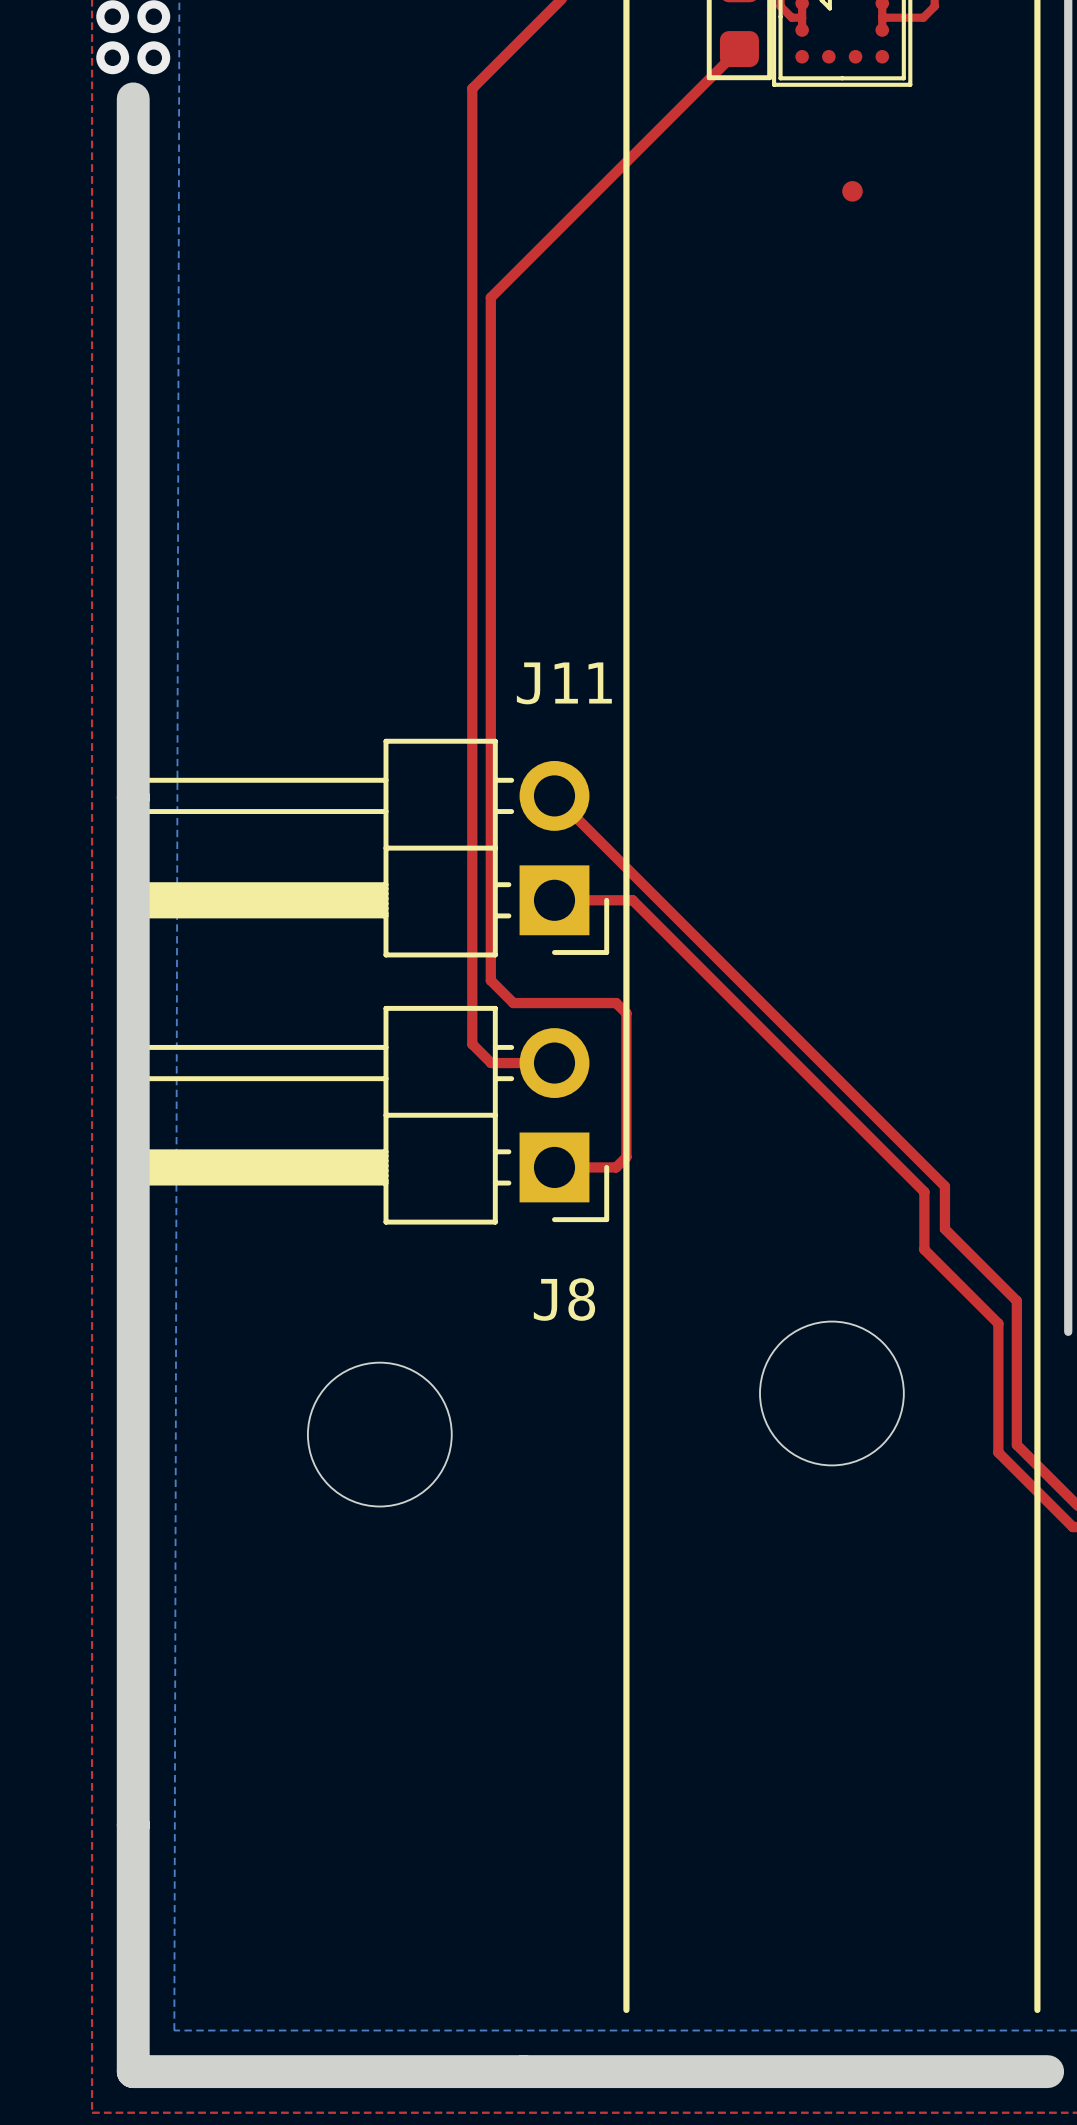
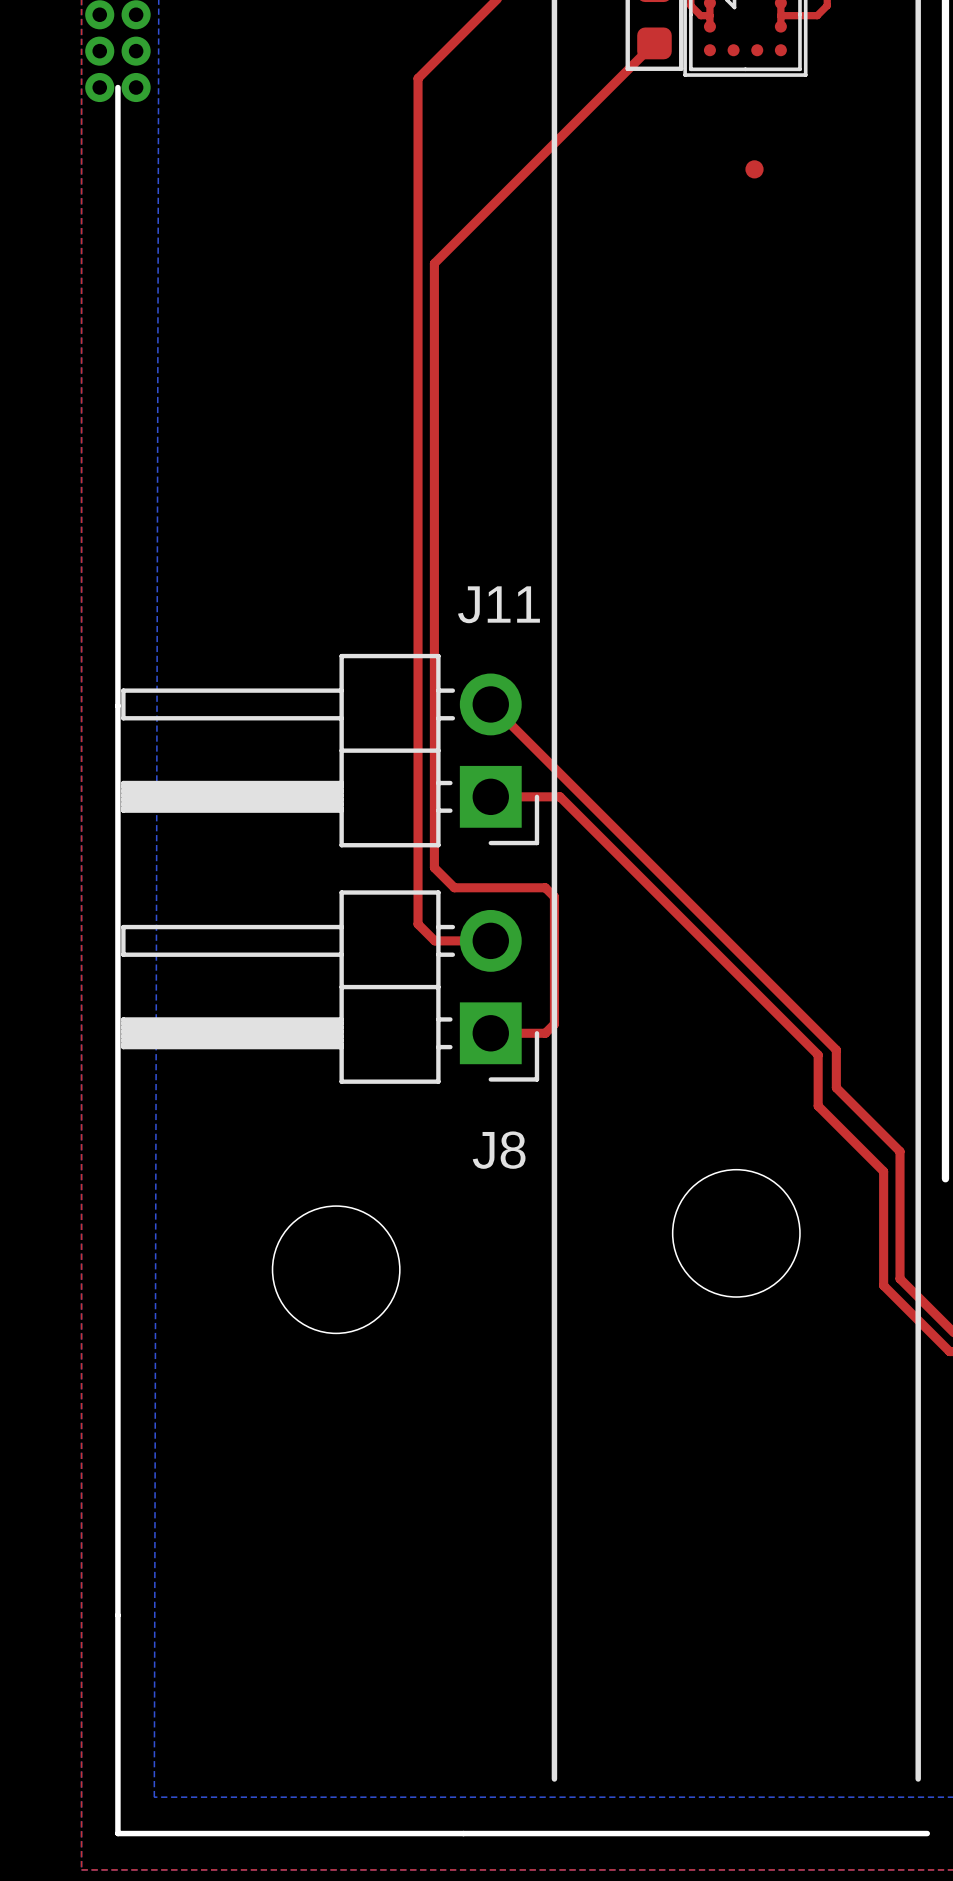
via: none -> (99, 87)
board edge width: thick (133, 98) (133, 2071) (1047, 2071) -> thin (117, 87) (117, 1833) (927, 1833)
via: none -> (136, 87)

